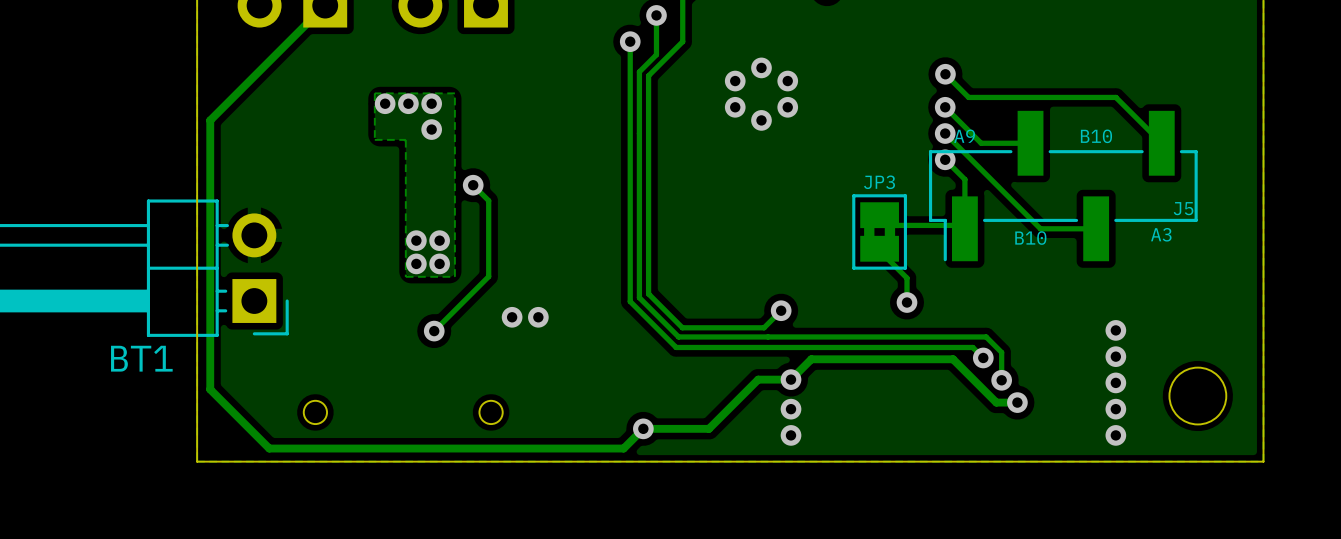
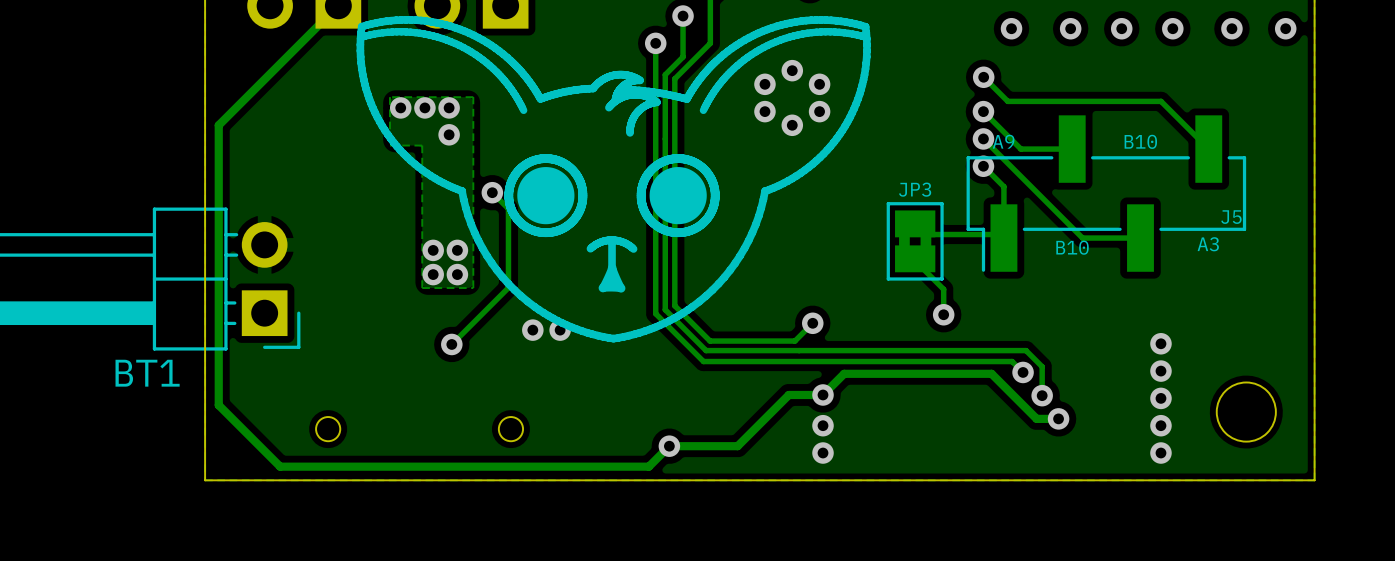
via: none -> (1011, 28)
via: none -> (1070, 28)
via: none -> (1121, 28)
via: none -> (1172, 28)
via: none -> (1231, 28)
via: none -> (1285, 28)
line: none -> (360, 37) (383, 32) (410, 32) (433, 35) (455, 43) (479, 57) (496, 71) (511, 90) (523, 110)
line: none -> (866, 37) (844, 32) (816, 32) (793, 35) (772, 43) (748, 57) (730, 71) (715, 90) (703, 110)
line: none -> (619, 89) (653, 92) (686, 99) (702, 76) (720, 57) (740, 42) (762, 31) (786, 23) (811, 20) (841, 21) (865, 26) (866, 50) (863, 79) (856, 103) (845, 126) (830, 146) (812, 164) (787, 181) (765, 191)
line: none -> (615, 99) (623, 85) (631, 81) (640, 80) (628, 75) (614, 75) (603, 79) (593, 88) (566, 91) (540, 98) (525, 76) (507, 57) (487, 42) (464, 31) (440, 23) (416, 20) (386, 21) (361, 26) (360, 50) (363, 79) (371, 103) (382, 126) (396, 146) (414, 164) (439, 180) (462, 191)
line: none -> (608, 107) (619, 98) (631, 94) (645, 96) (656, 102) (646, 105) (637, 112) (631, 121) (630, 132)
line: none -> (547, 158) (561, 162) (573, 170) (580, 182) (582, 197) (579, 211) (570, 223) (558, 230) (543, 232) (529, 229) (518, 220) (511, 208) (508, 193) (512, 179) (520, 168) (533, 160) (547, 158)
line: none -> (680, 158) (665, 160) (653, 168) (644, 179) (641, 193) (643, 208) (650, 220) (662, 229) (676, 232) (690, 230) (703, 223) (711, 211) (715, 197) (712, 182) (705, 170) (694, 162) (680, 158)
drawing: none -> [517, 167, 575, 225]
drawing: none -> [649, 167, 707, 225]
line: none -> (765, 190) (758, 216) (748, 240) (730, 270) (712, 290) (687, 309) (664, 323) (639, 332) (613, 338) (587, 332) (562, 323) (539, 309) (514, 290) (497, 270) (478, 240) (468, 216) (461, 190)
line: none -> (612, 240) (612, 268)
line: none -> (590, 248) (600, 242) (612, 240) (623, 242) (633, 249)
drawing: none -> [598, 263, 626, 293]

